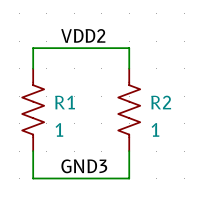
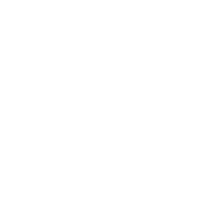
label: VDD2 (83, 35) -> none
wire: (33, 68) (33, 48) (129, 48) (129, 68) -> none
R1: 1 (33, 109) -> none
R2: 1 (129, 109) -> none
wire: (33, 151) (33, 178) (129, 178) (129, 151) -> none
label: GND3 (84, 166) -> none

